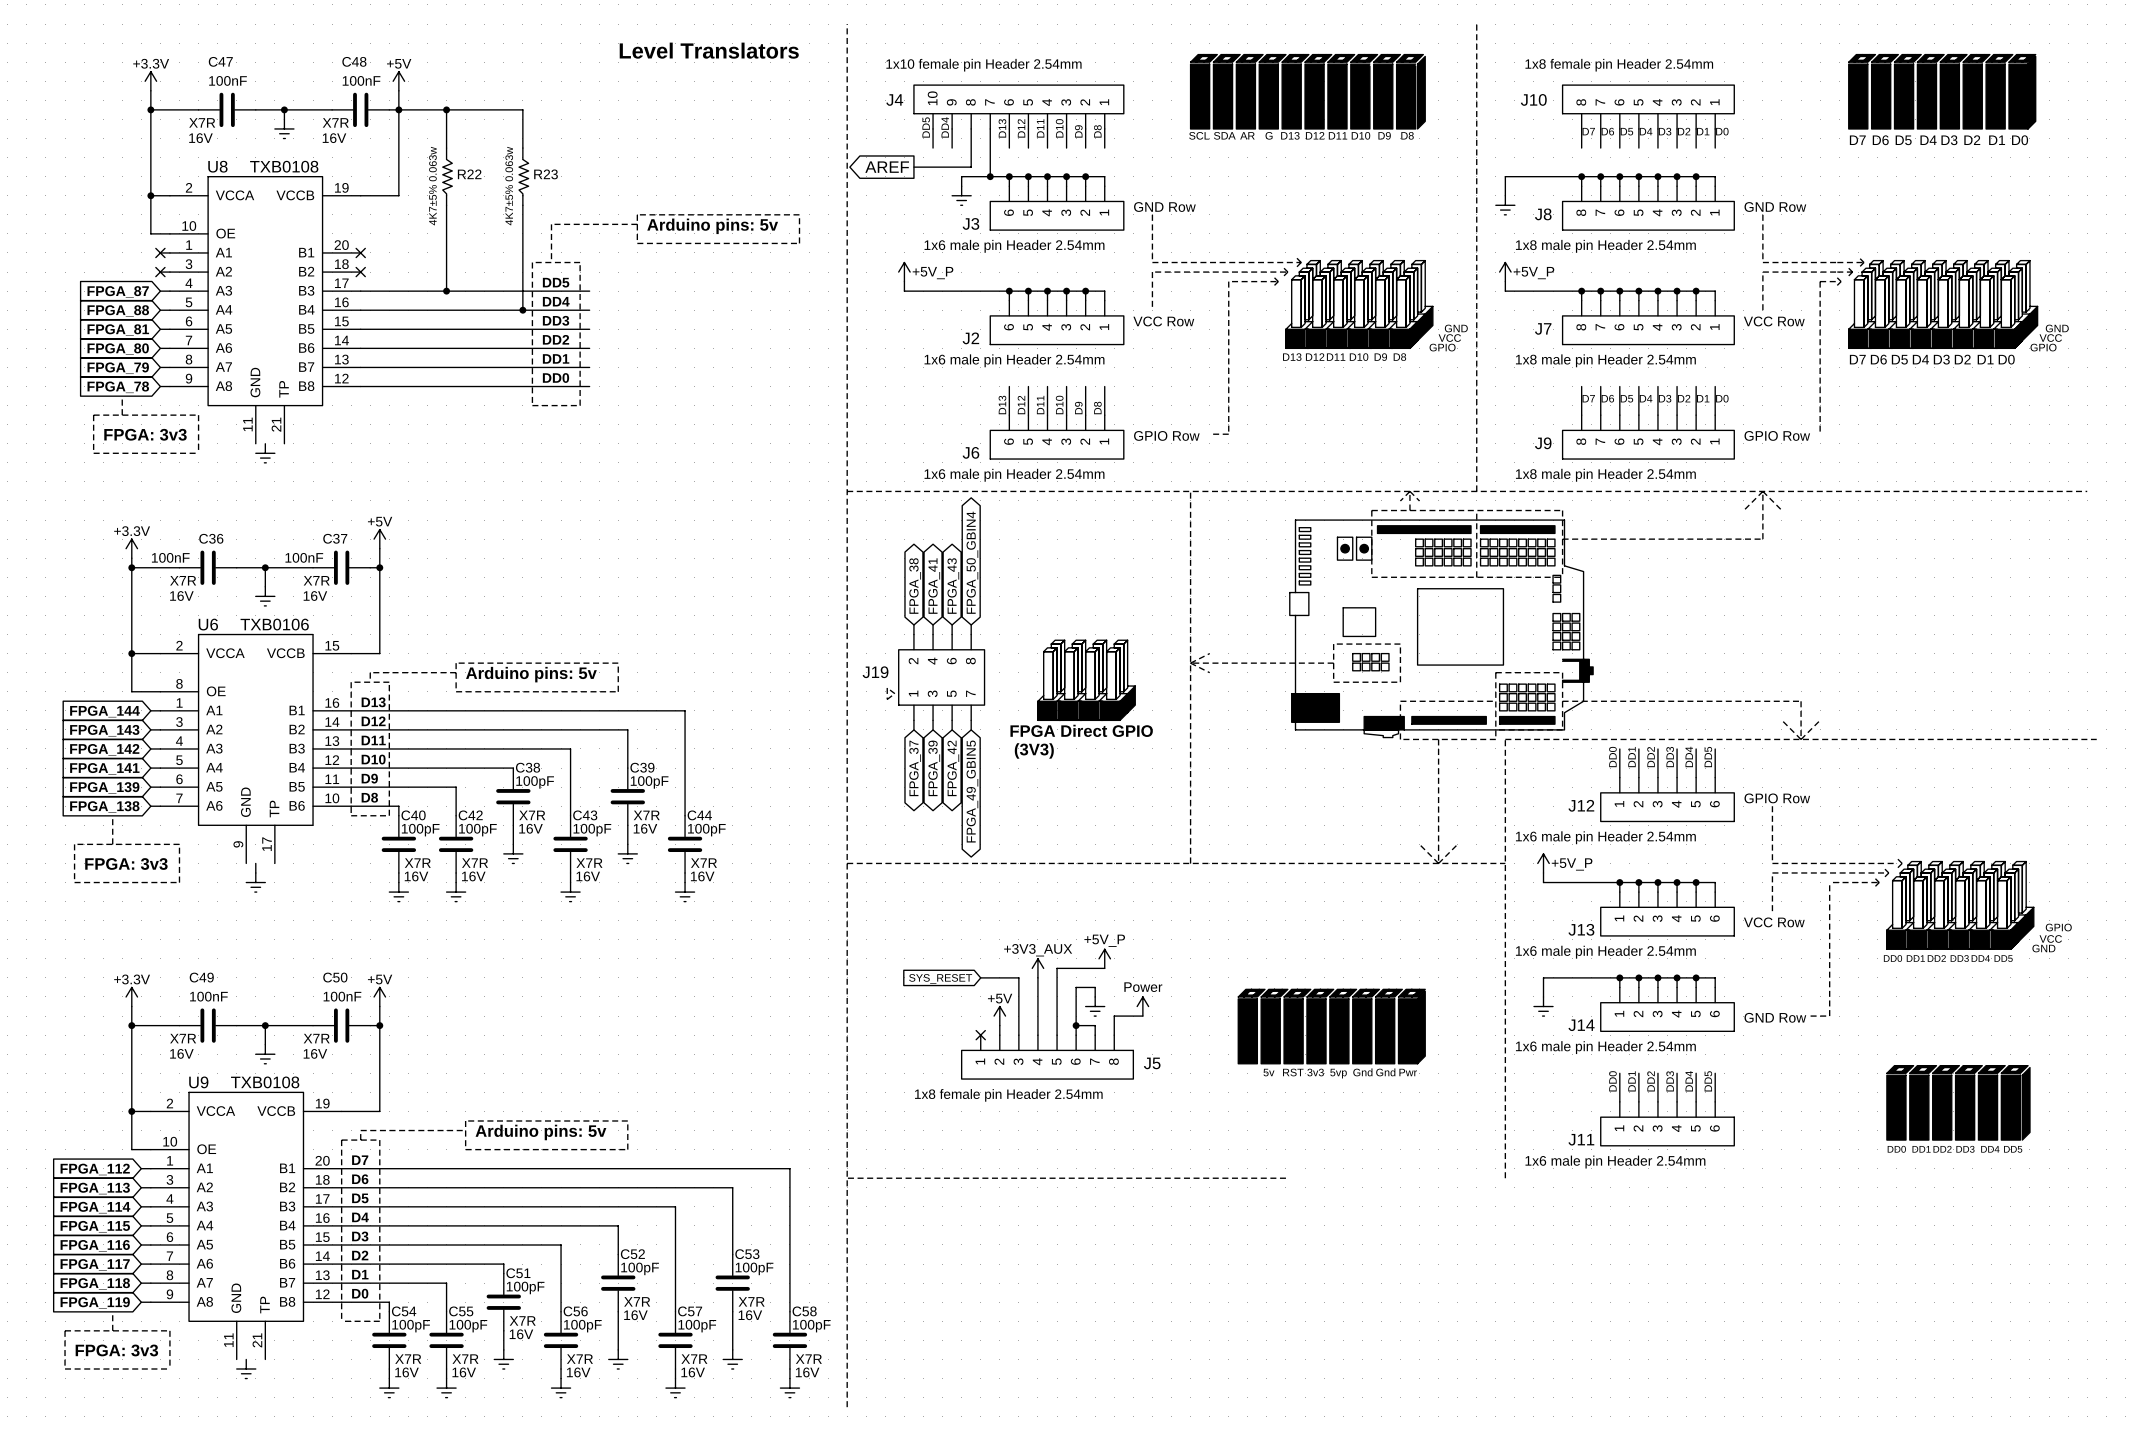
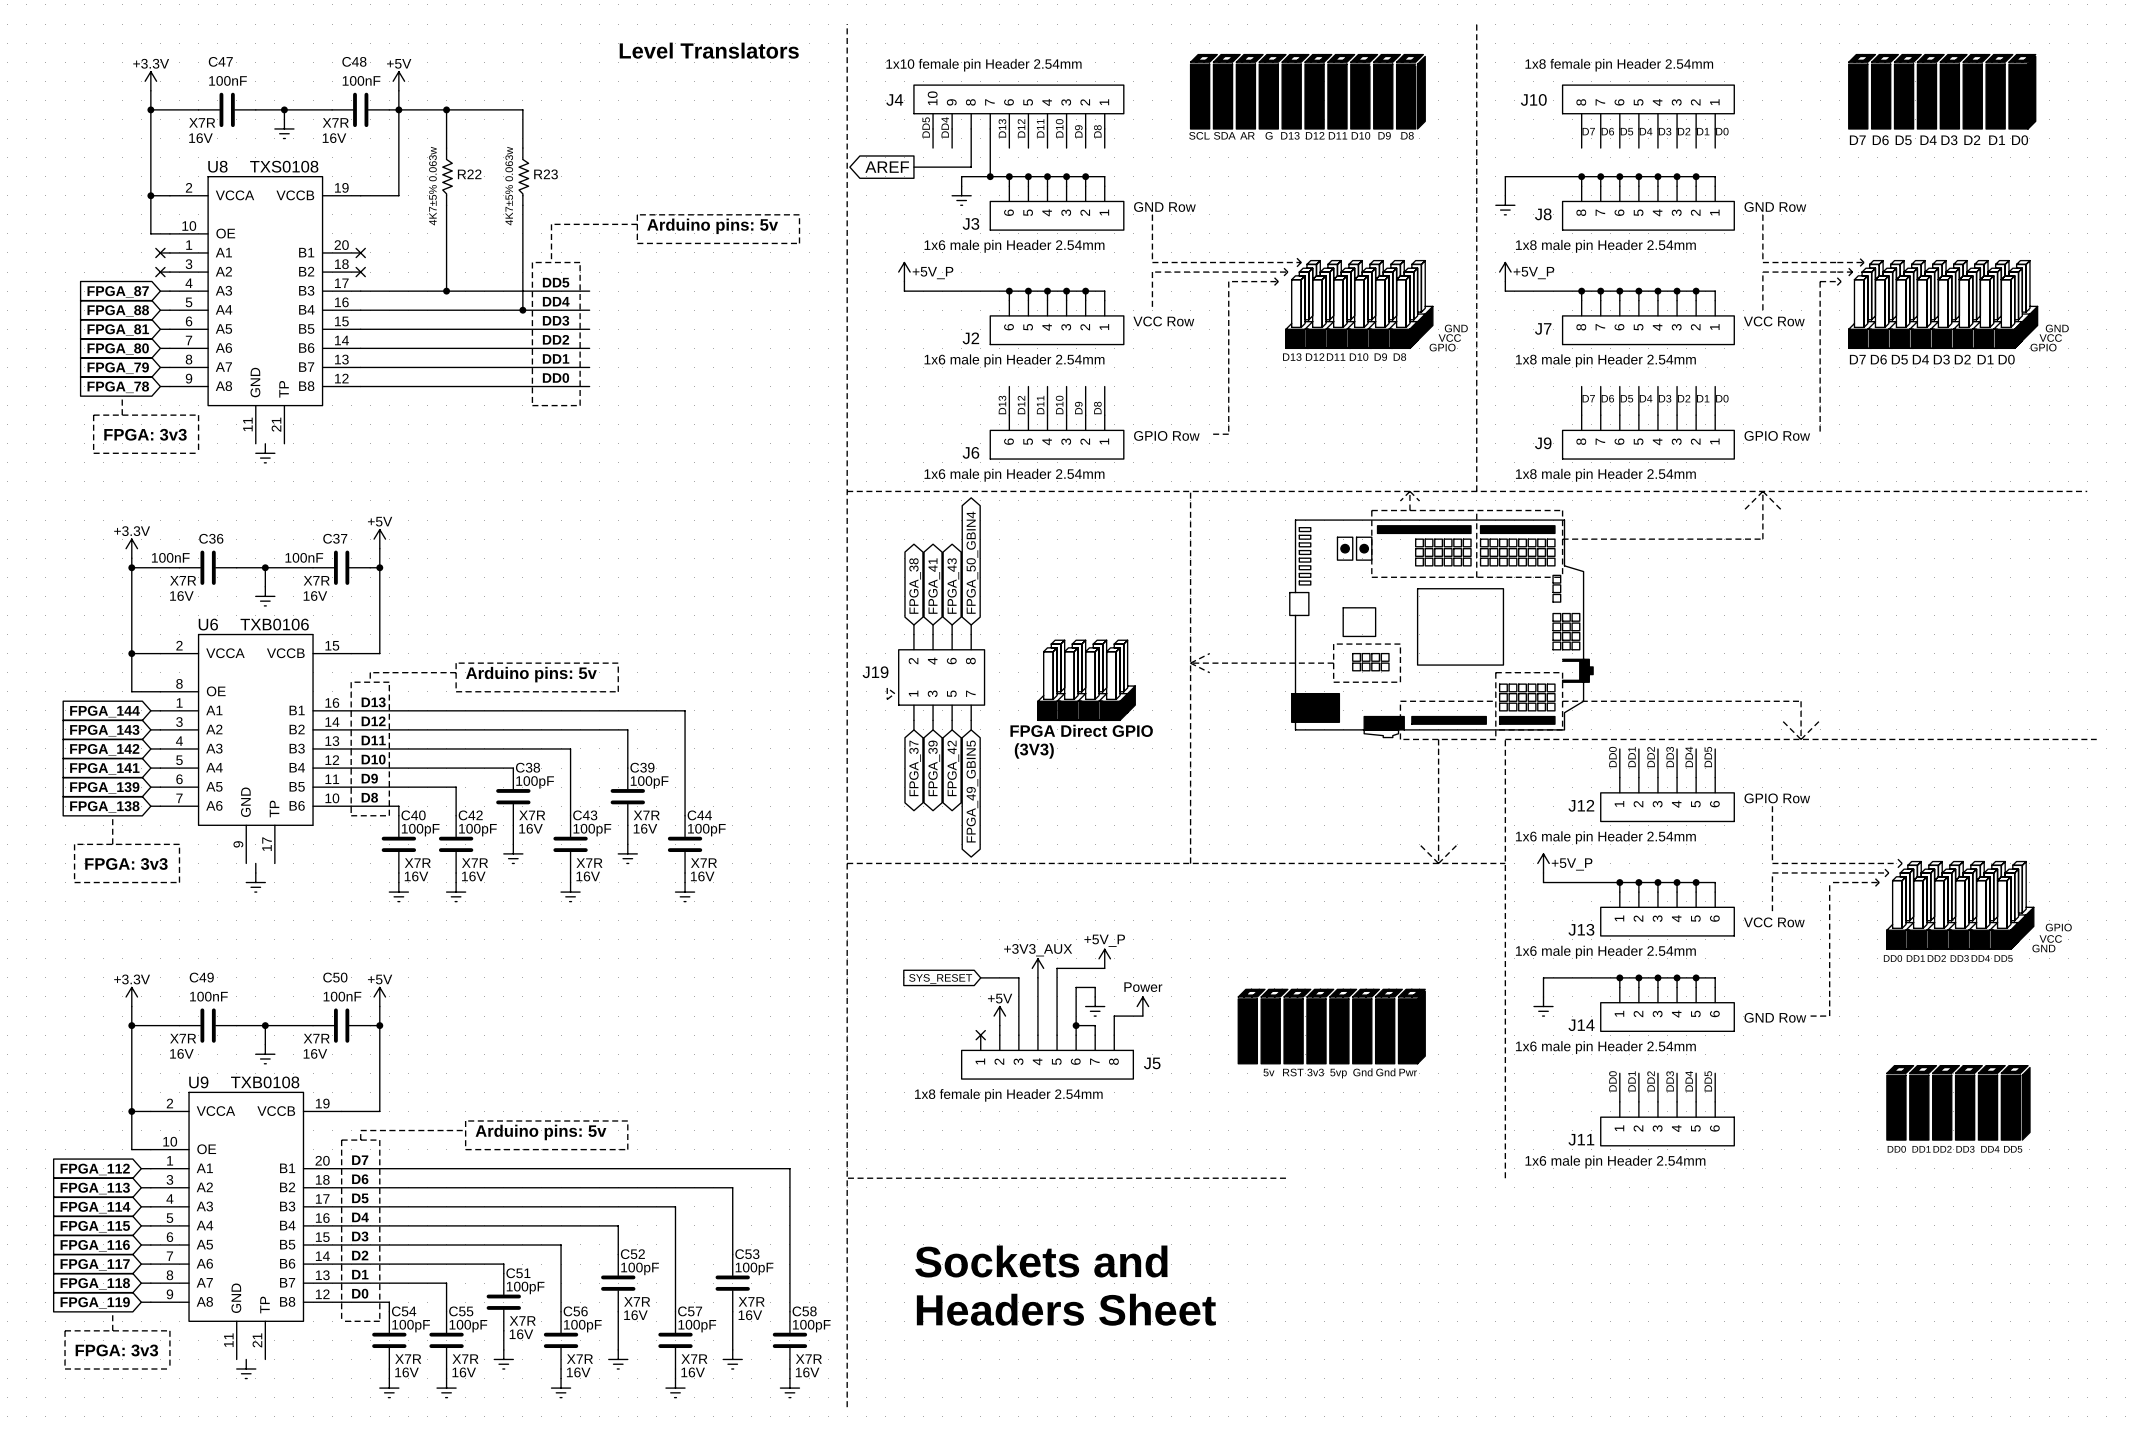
U8 value: TXB0108 (284, 166) -> TXS0108 (284, 166)
text: none -> Sockets and (1041, 1261)
text: none -> Headers Sheet (1066, 1309)

